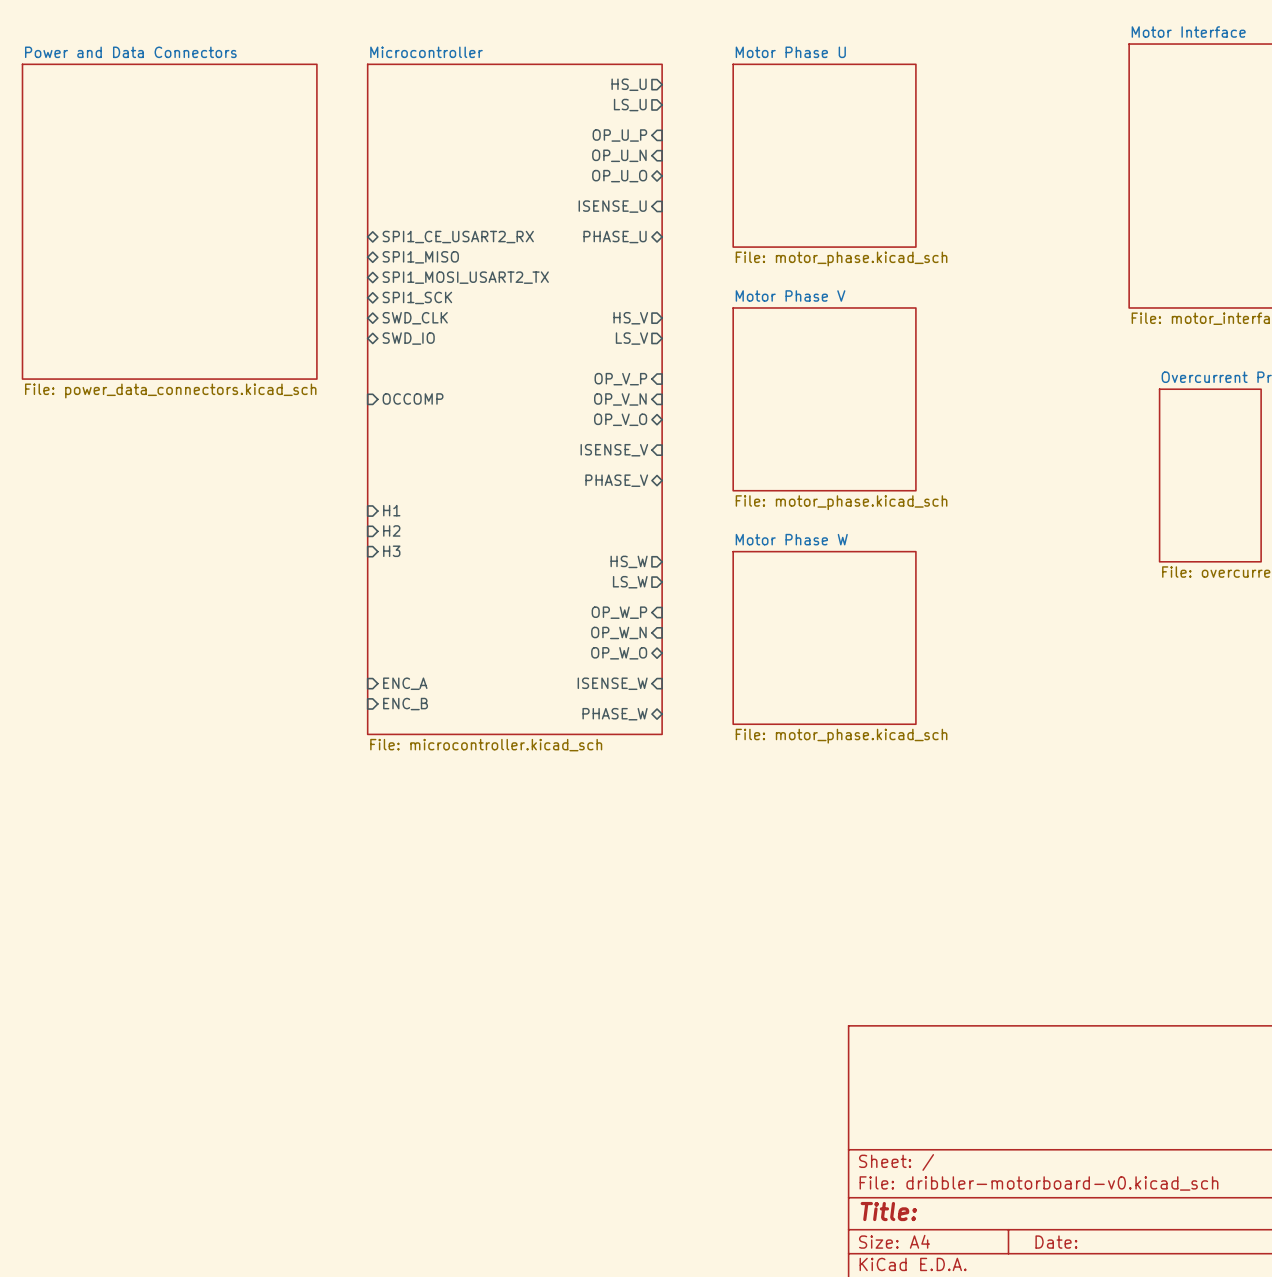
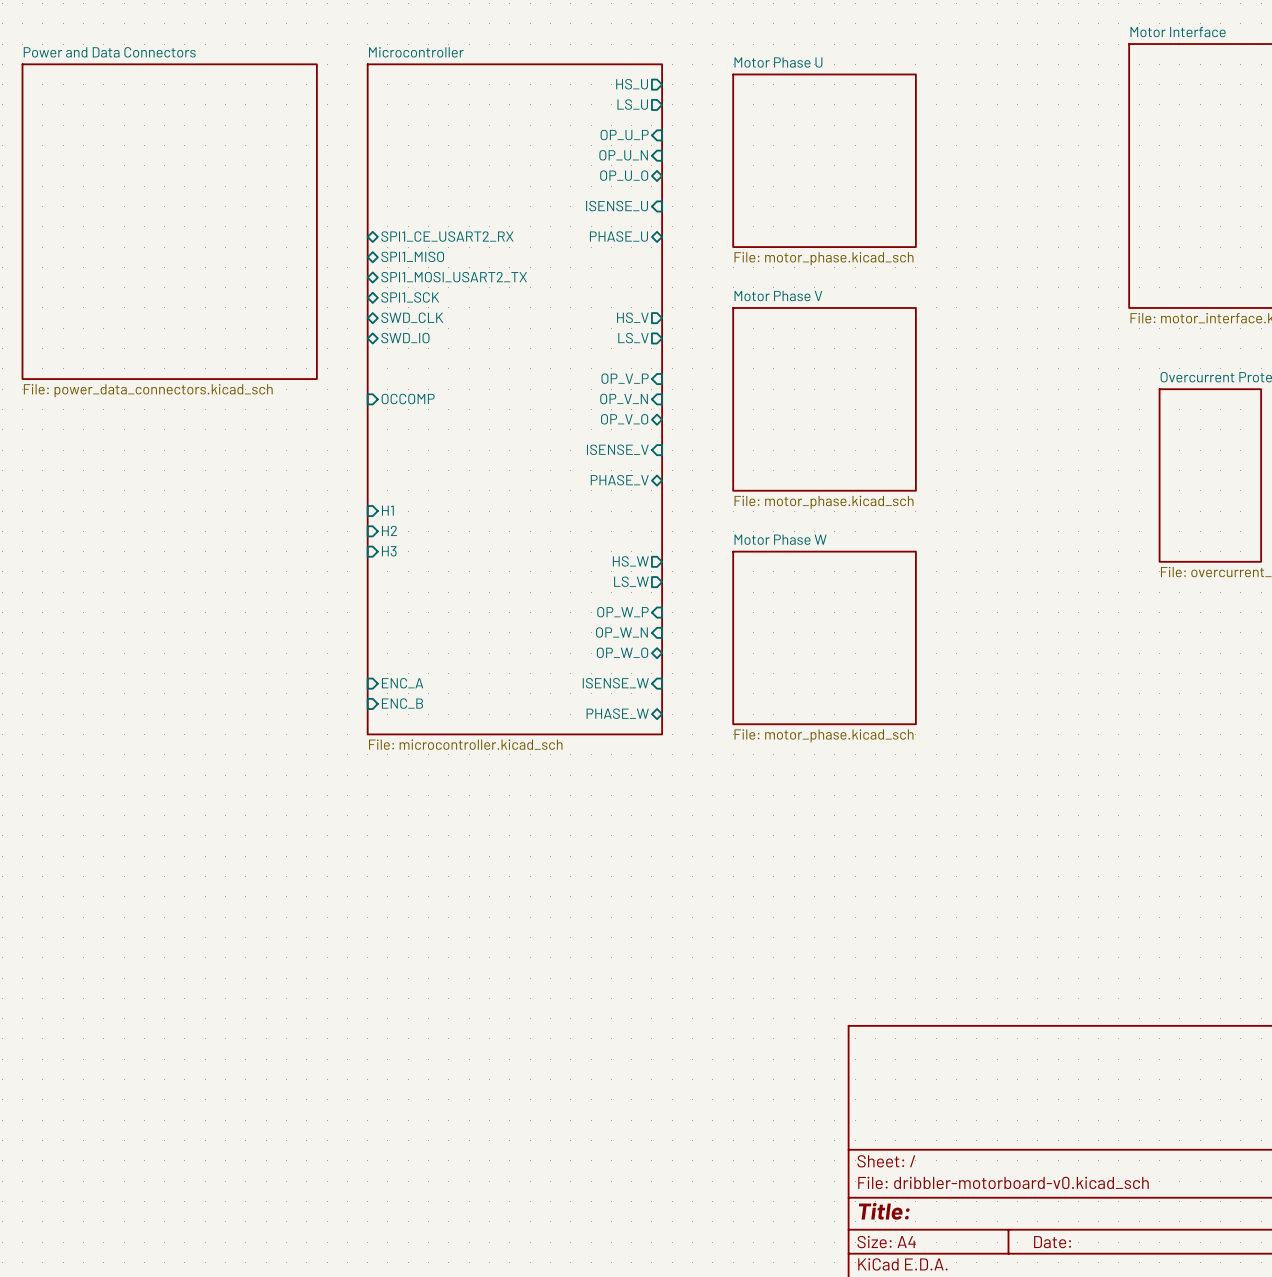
sheet Motor Phase U shape: [732, 63, 917, 248] -> [732, 73, 917, 248]

